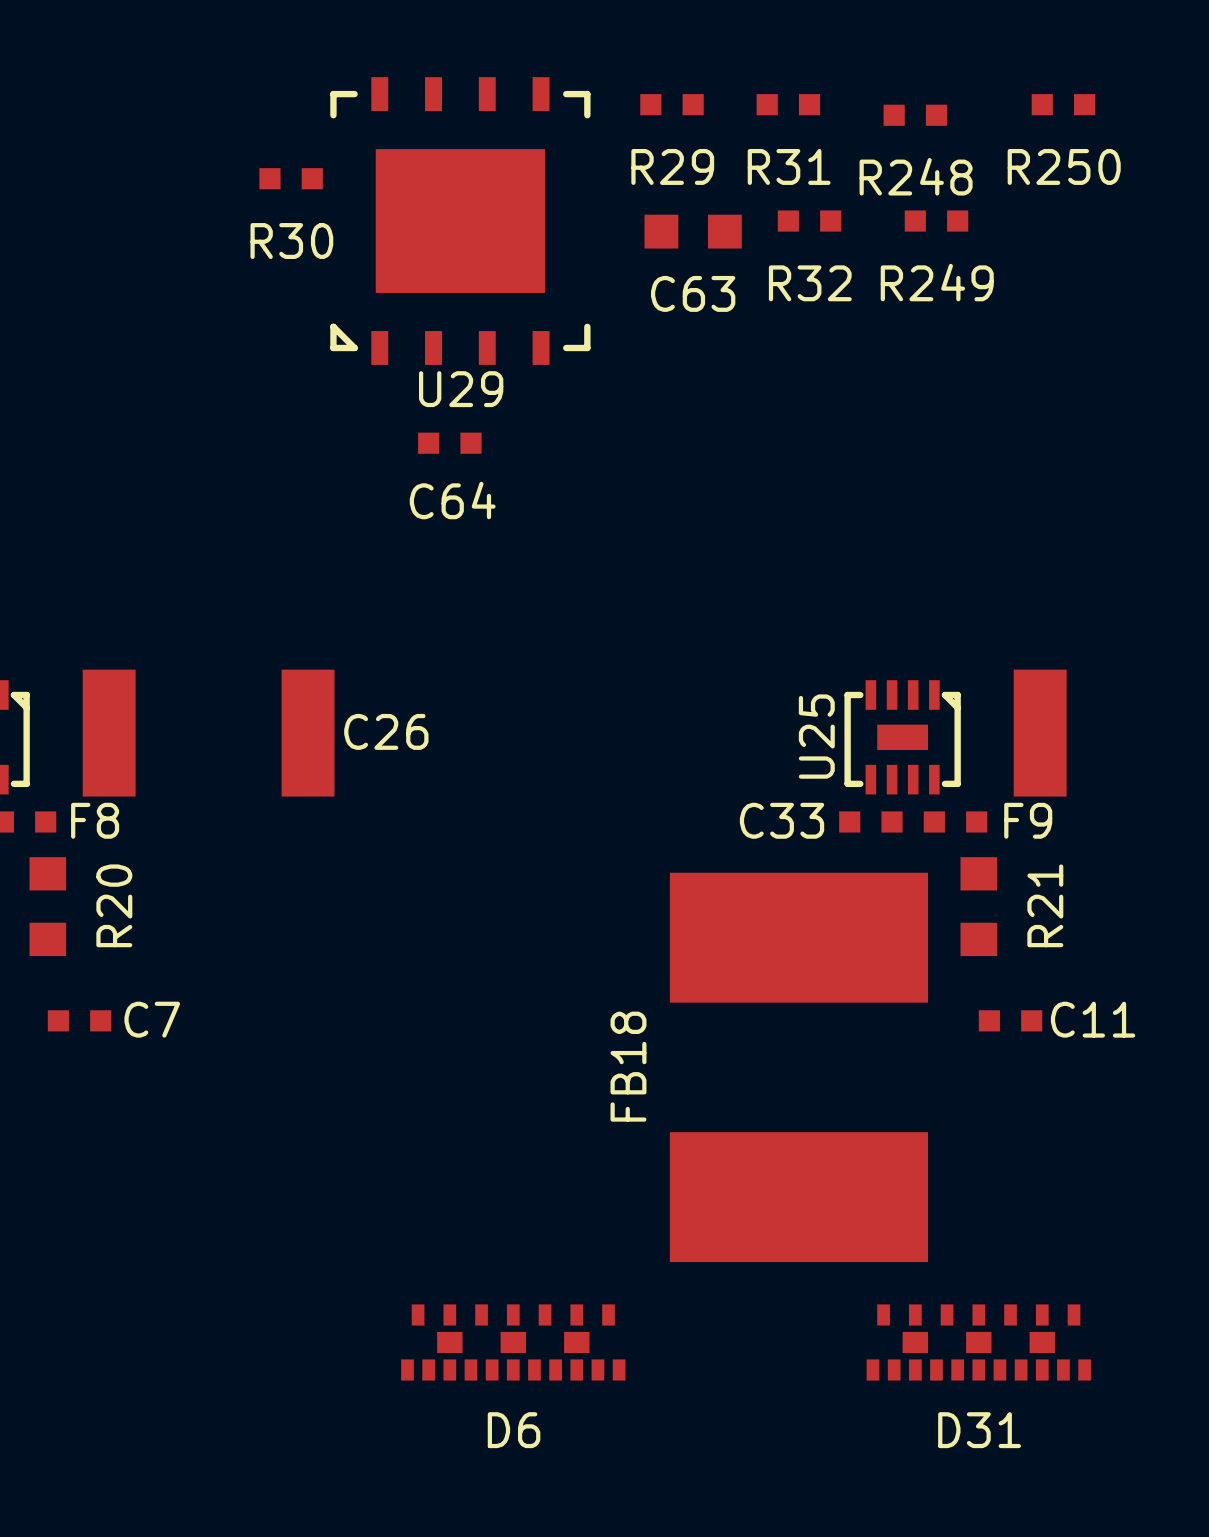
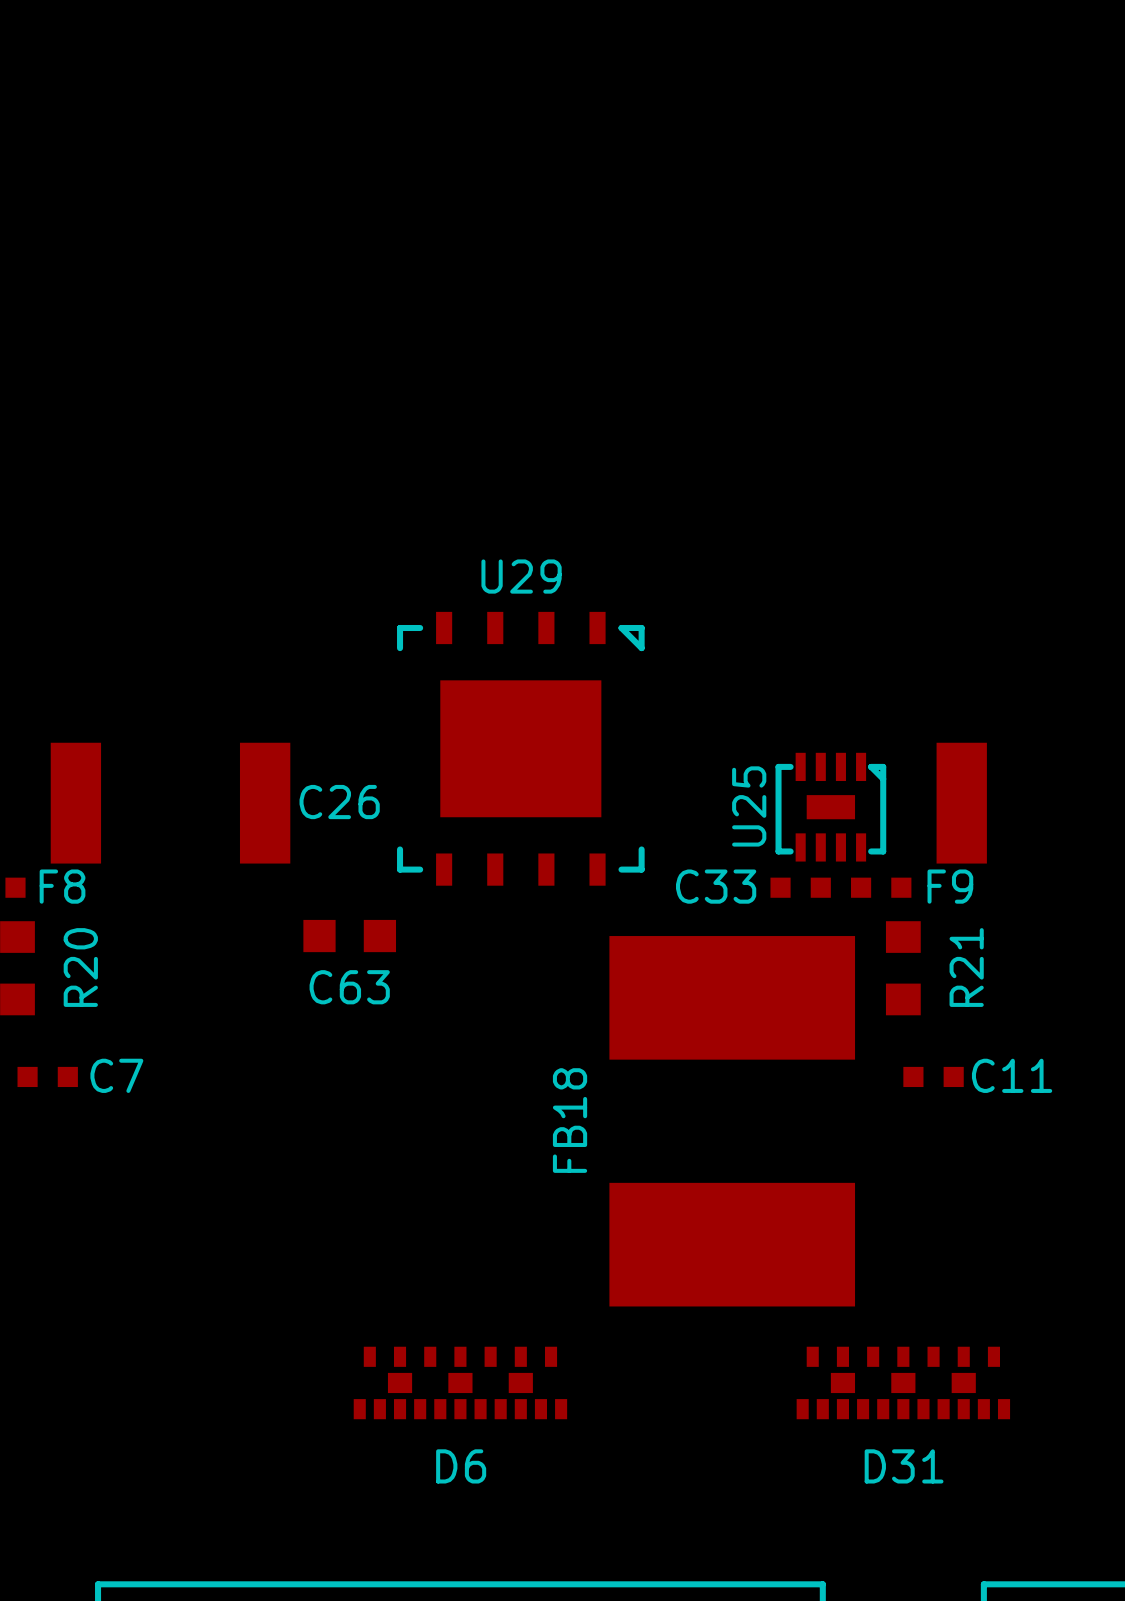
R29: (671, 104) -> none
R31: (788, 104) -> none
R250: (1063, 104) -> none
R248: (915, 115) -> none
R30: (291, 178) -> none
U29 rotation: 0° (460, 221) -> 180° (520, 748)
U29 position: (460, 221) -> (520, 748)
R32: (809, 221) -> none
R249: (936, 221) -> none
C63 position: (693, 231) -> (349, 936)
C63 name position: C63 (693, 293) -> C63 (349, 987)
C64: (449, 443) -> none

